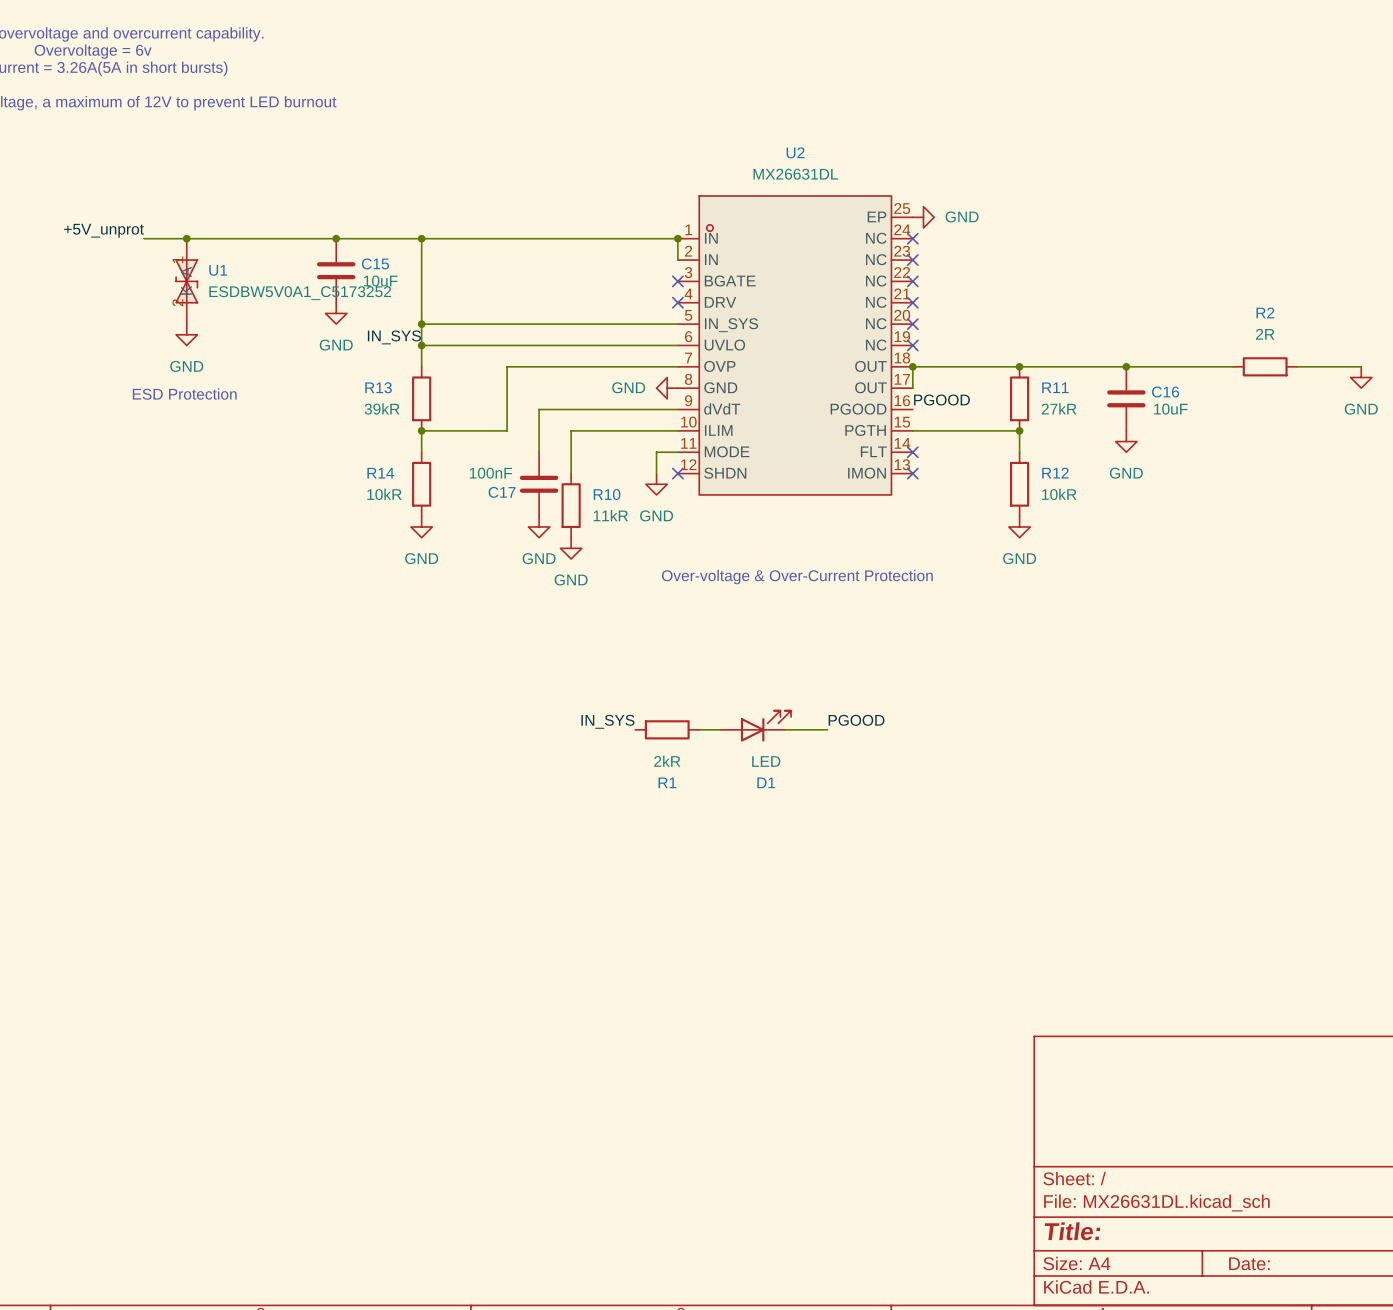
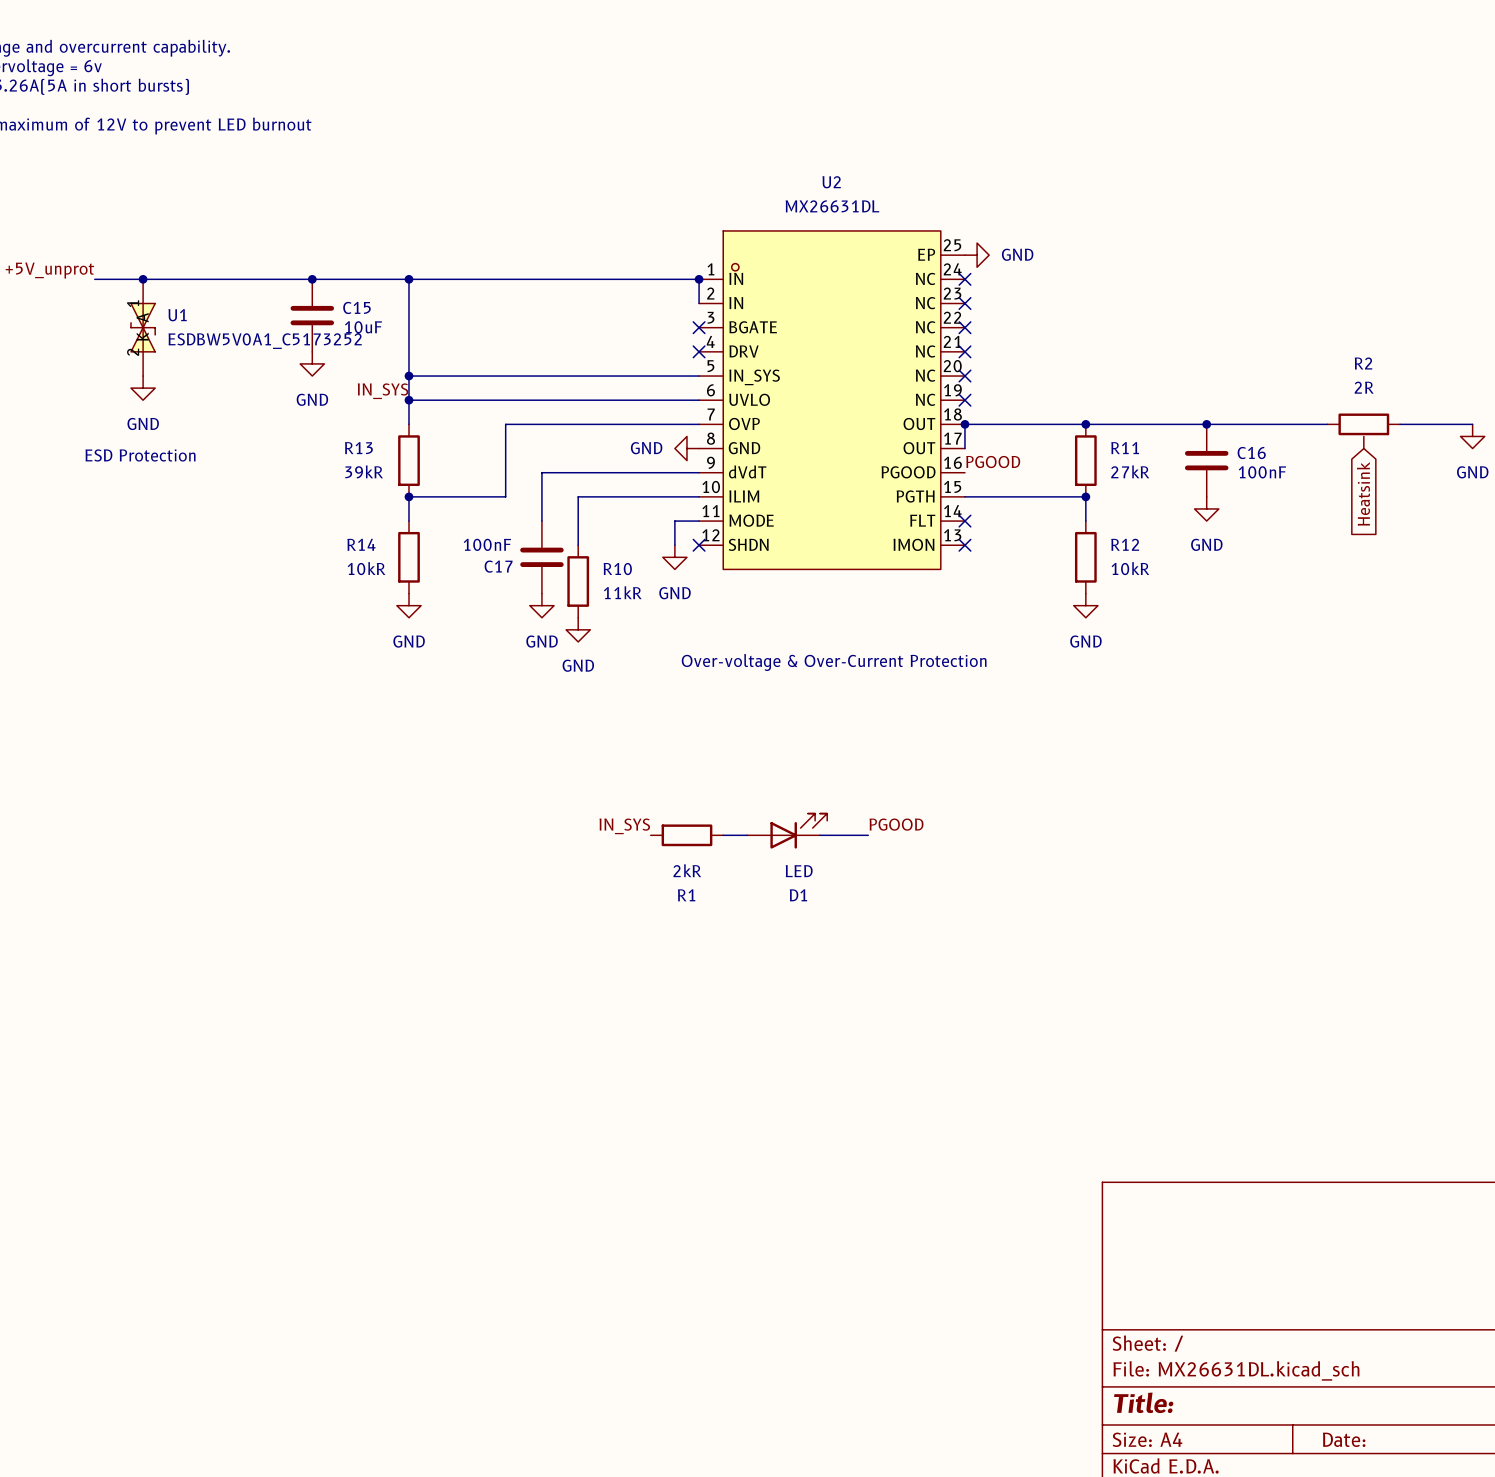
R2 symbol: [1233, 357, 1298, 377] -> [1327, 413, 1401, 449]
C16 value: 10uF (1170, 409) -> 100nF (1262, 472)
global label: none -> Heatsink (1363, 493)

